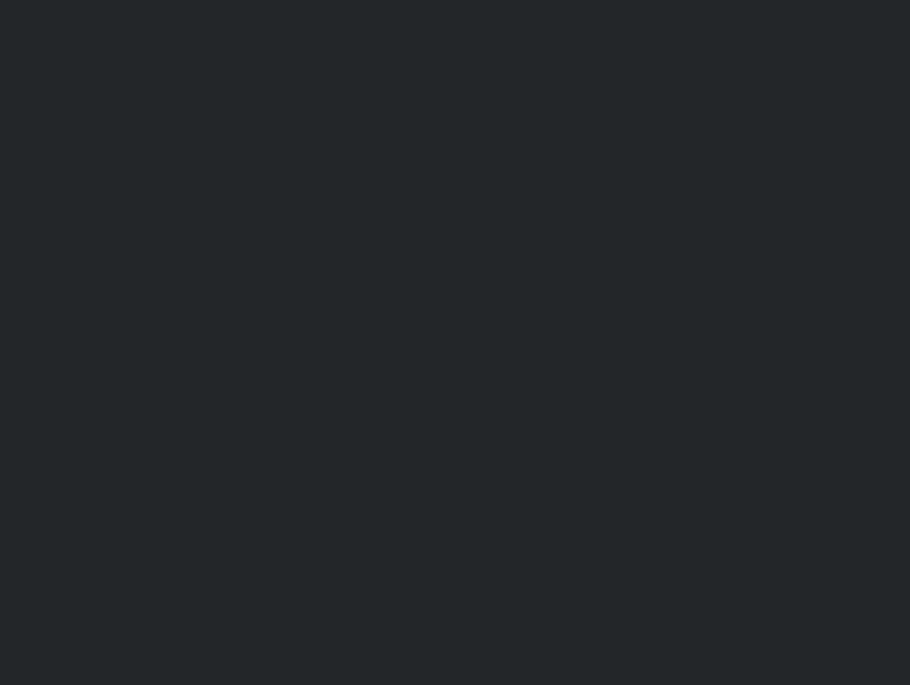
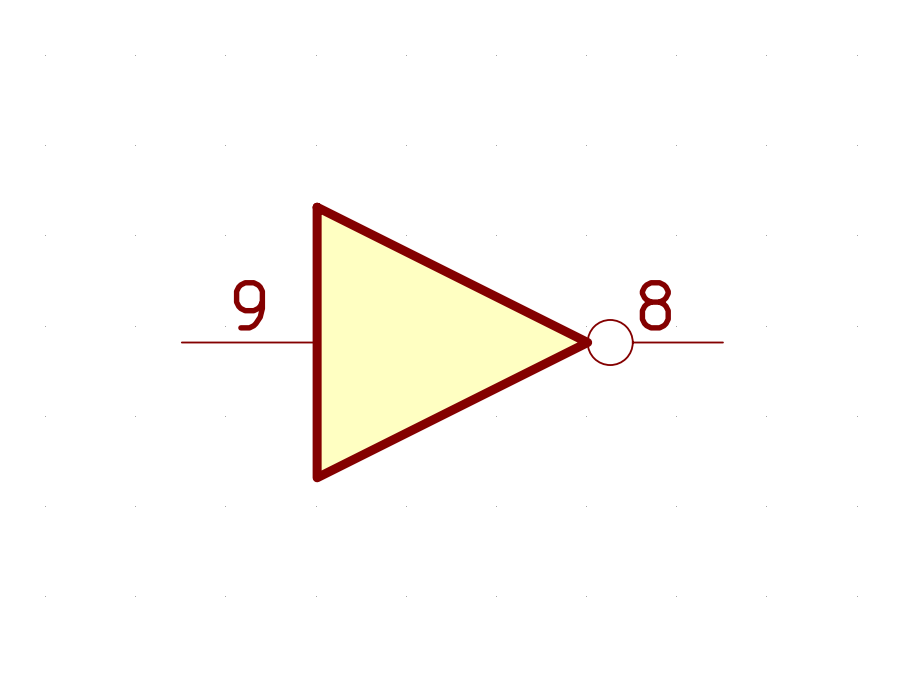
part: none -> (452, 342)

